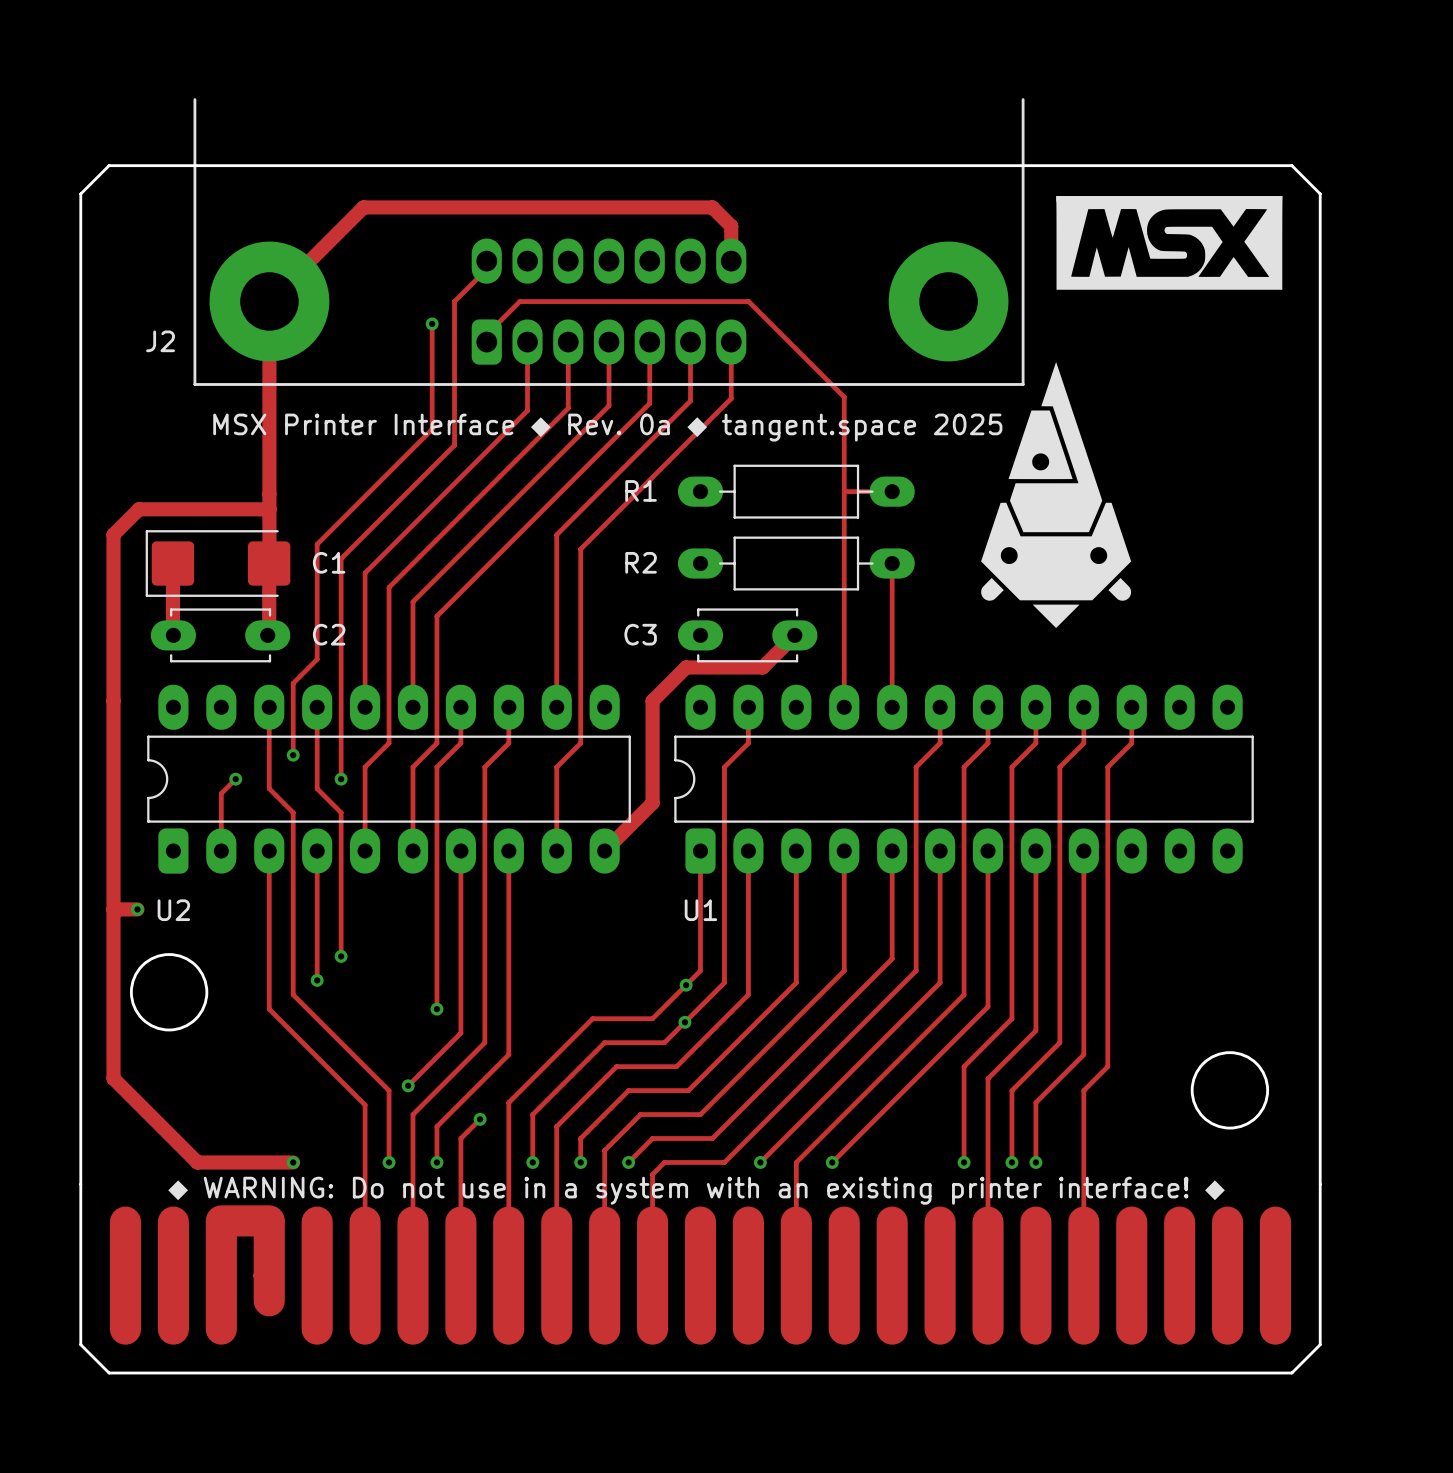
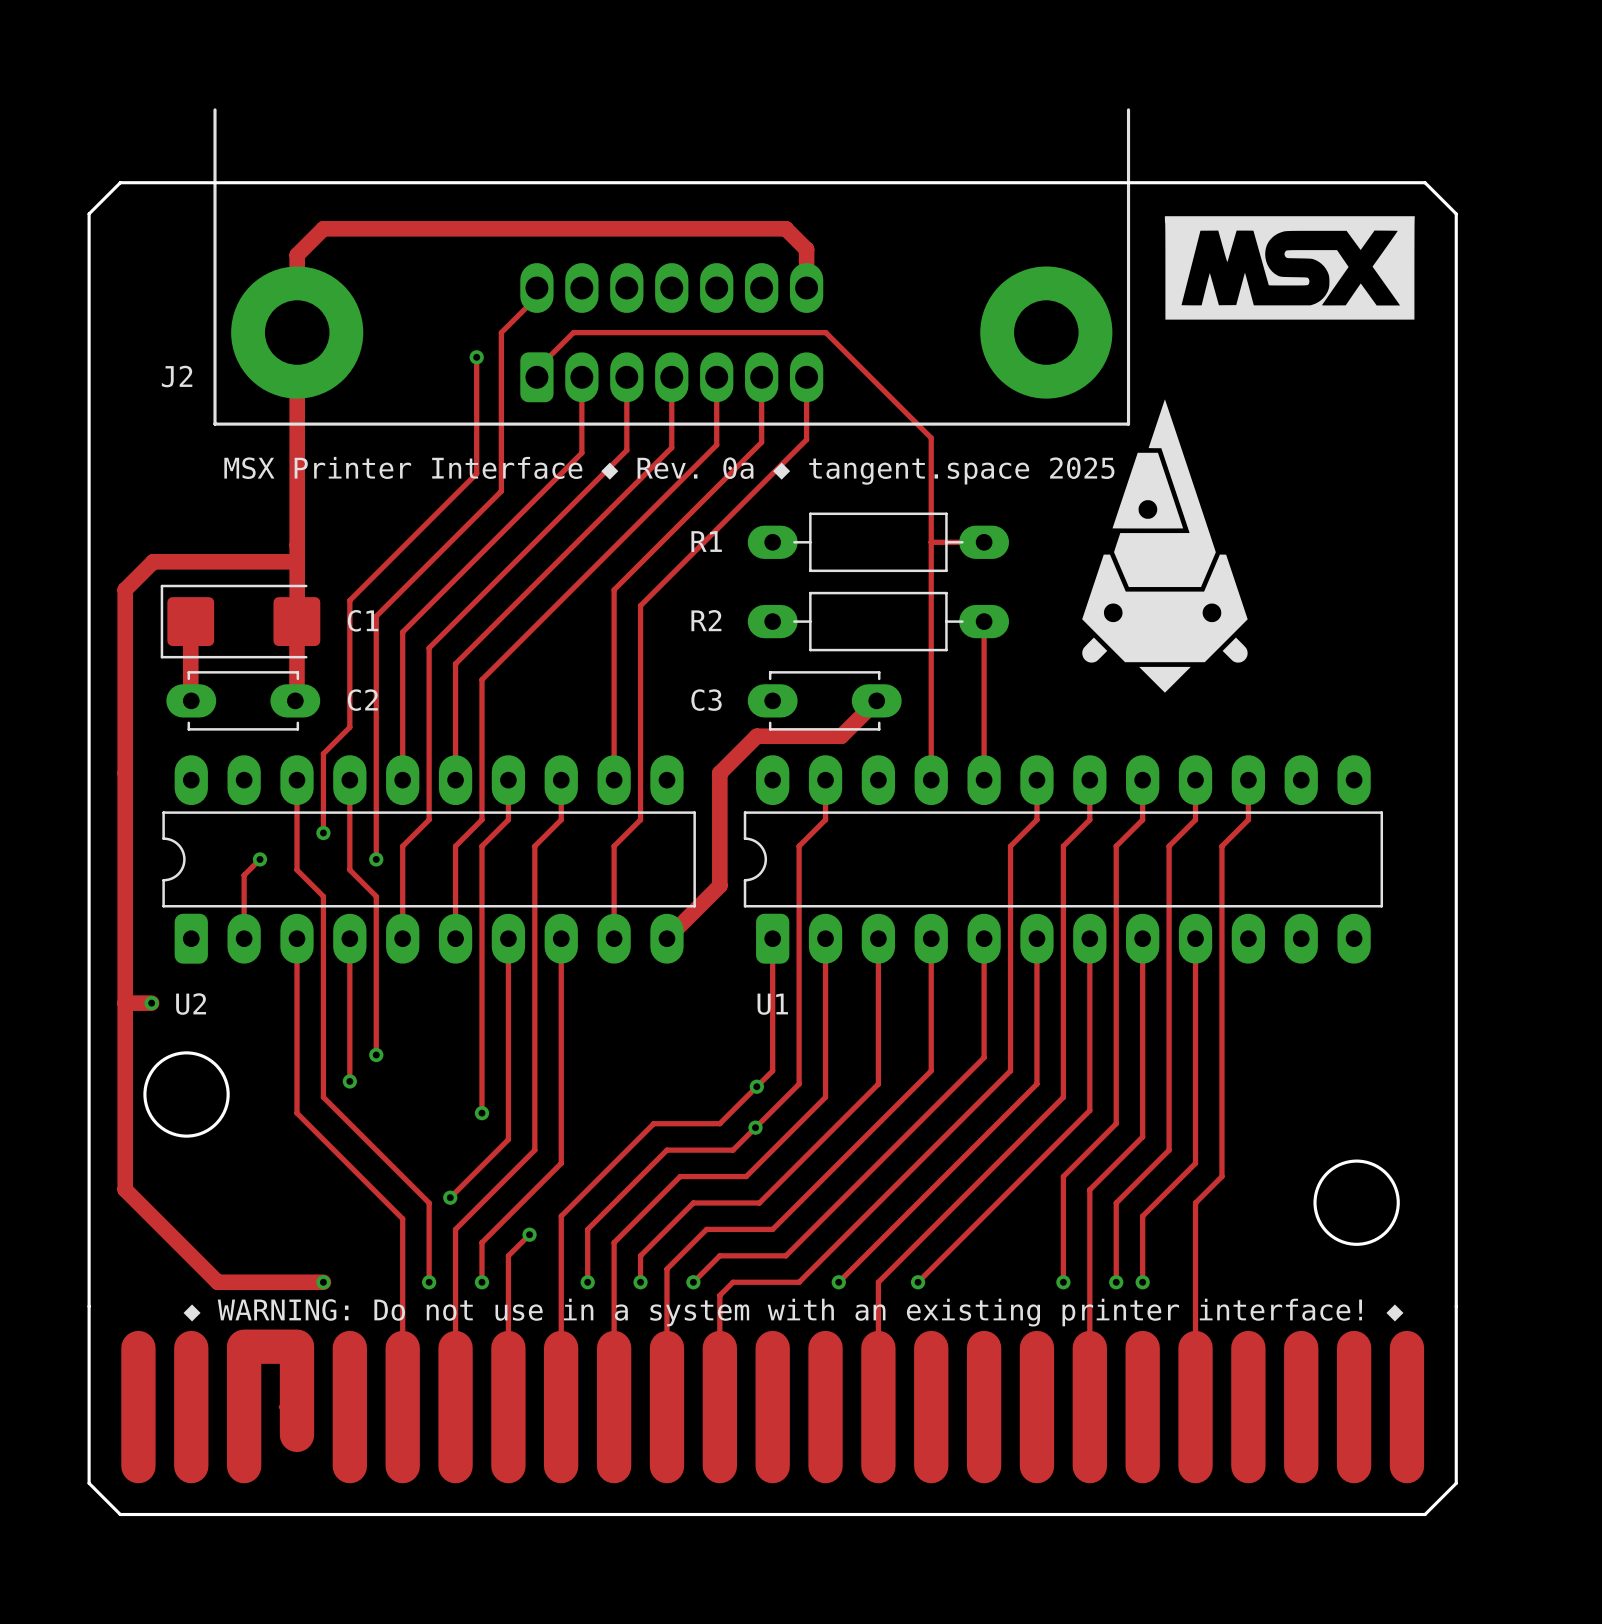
track: (363, 207) (269, 301) -> (400, 228) (323, 228) (297, 255) (297, 332)

